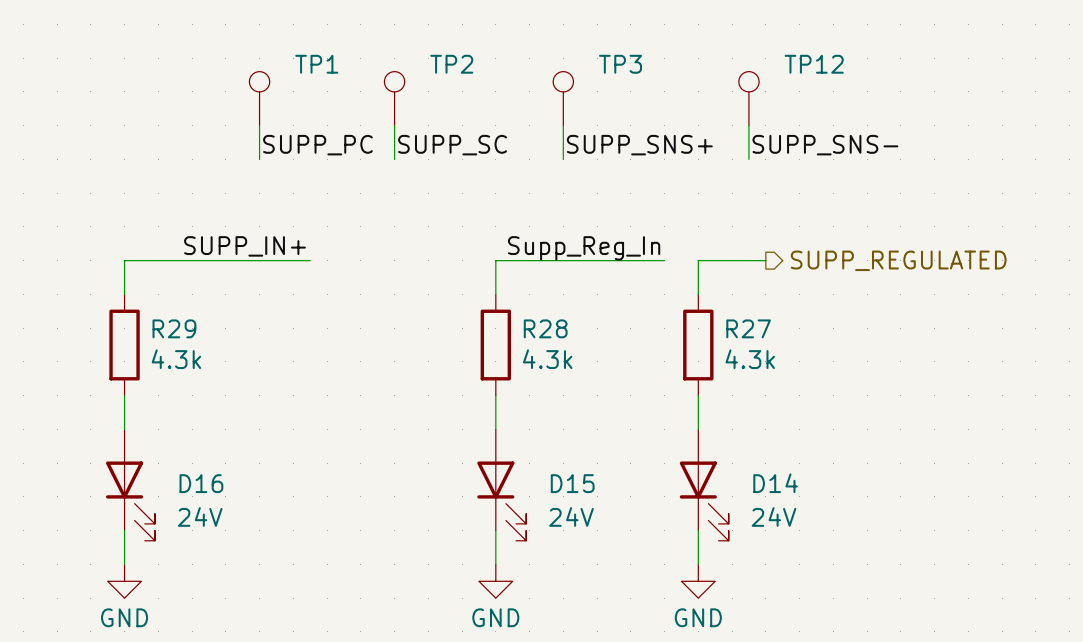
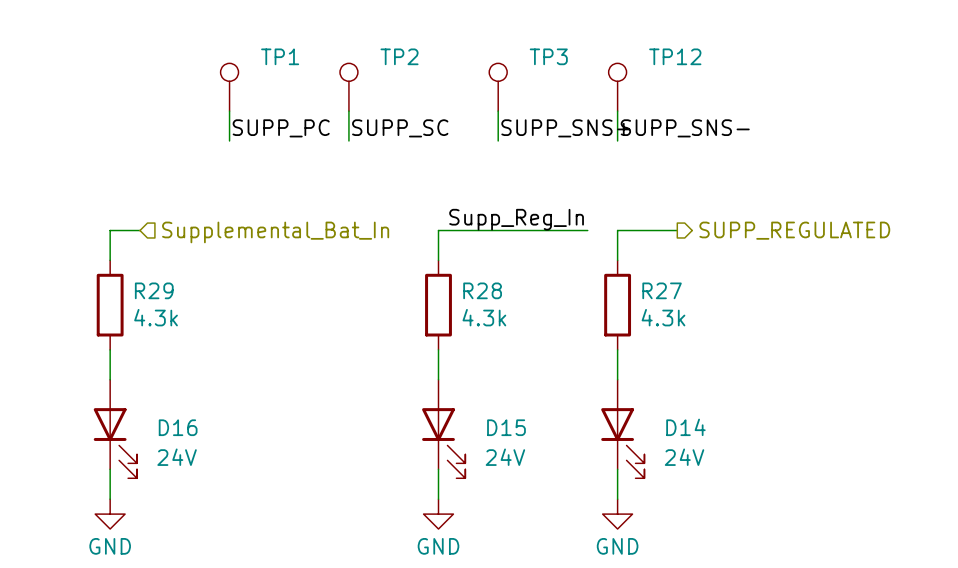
TP12 position: (748, 98) -> (617, 87)
wire: (748, 125) (748, 159) -> (617, 111) (617, 140)
label position: SUPP_SNS- (825, 145) -> SUPP_SNS- (685, 128)
label: SUPP_IN+ (244, 246) -> none
wire: (158, 260) (310, 260) -> none
hierarchical label: none -> Supplemental_Bat_In (275, 232)

